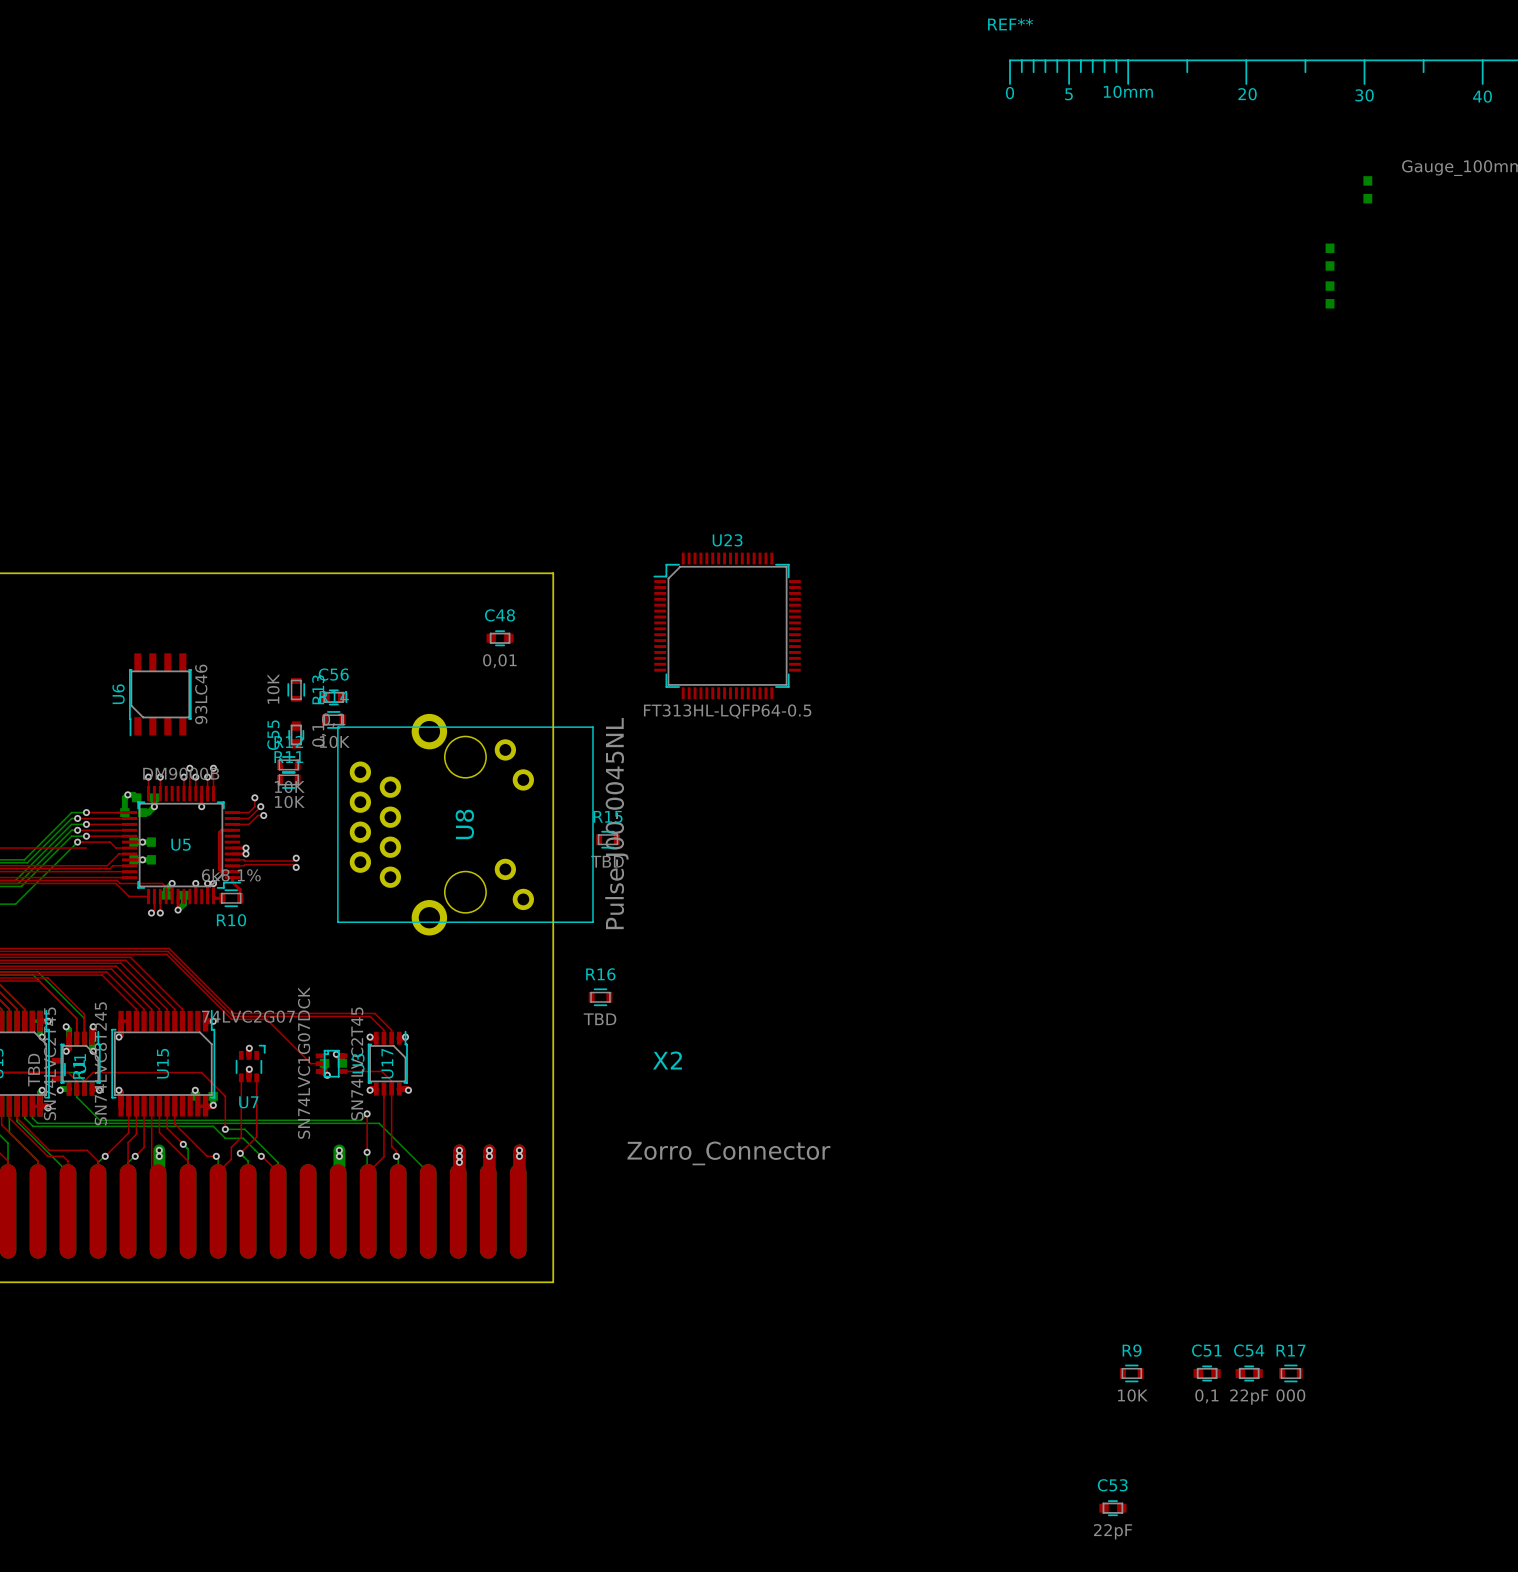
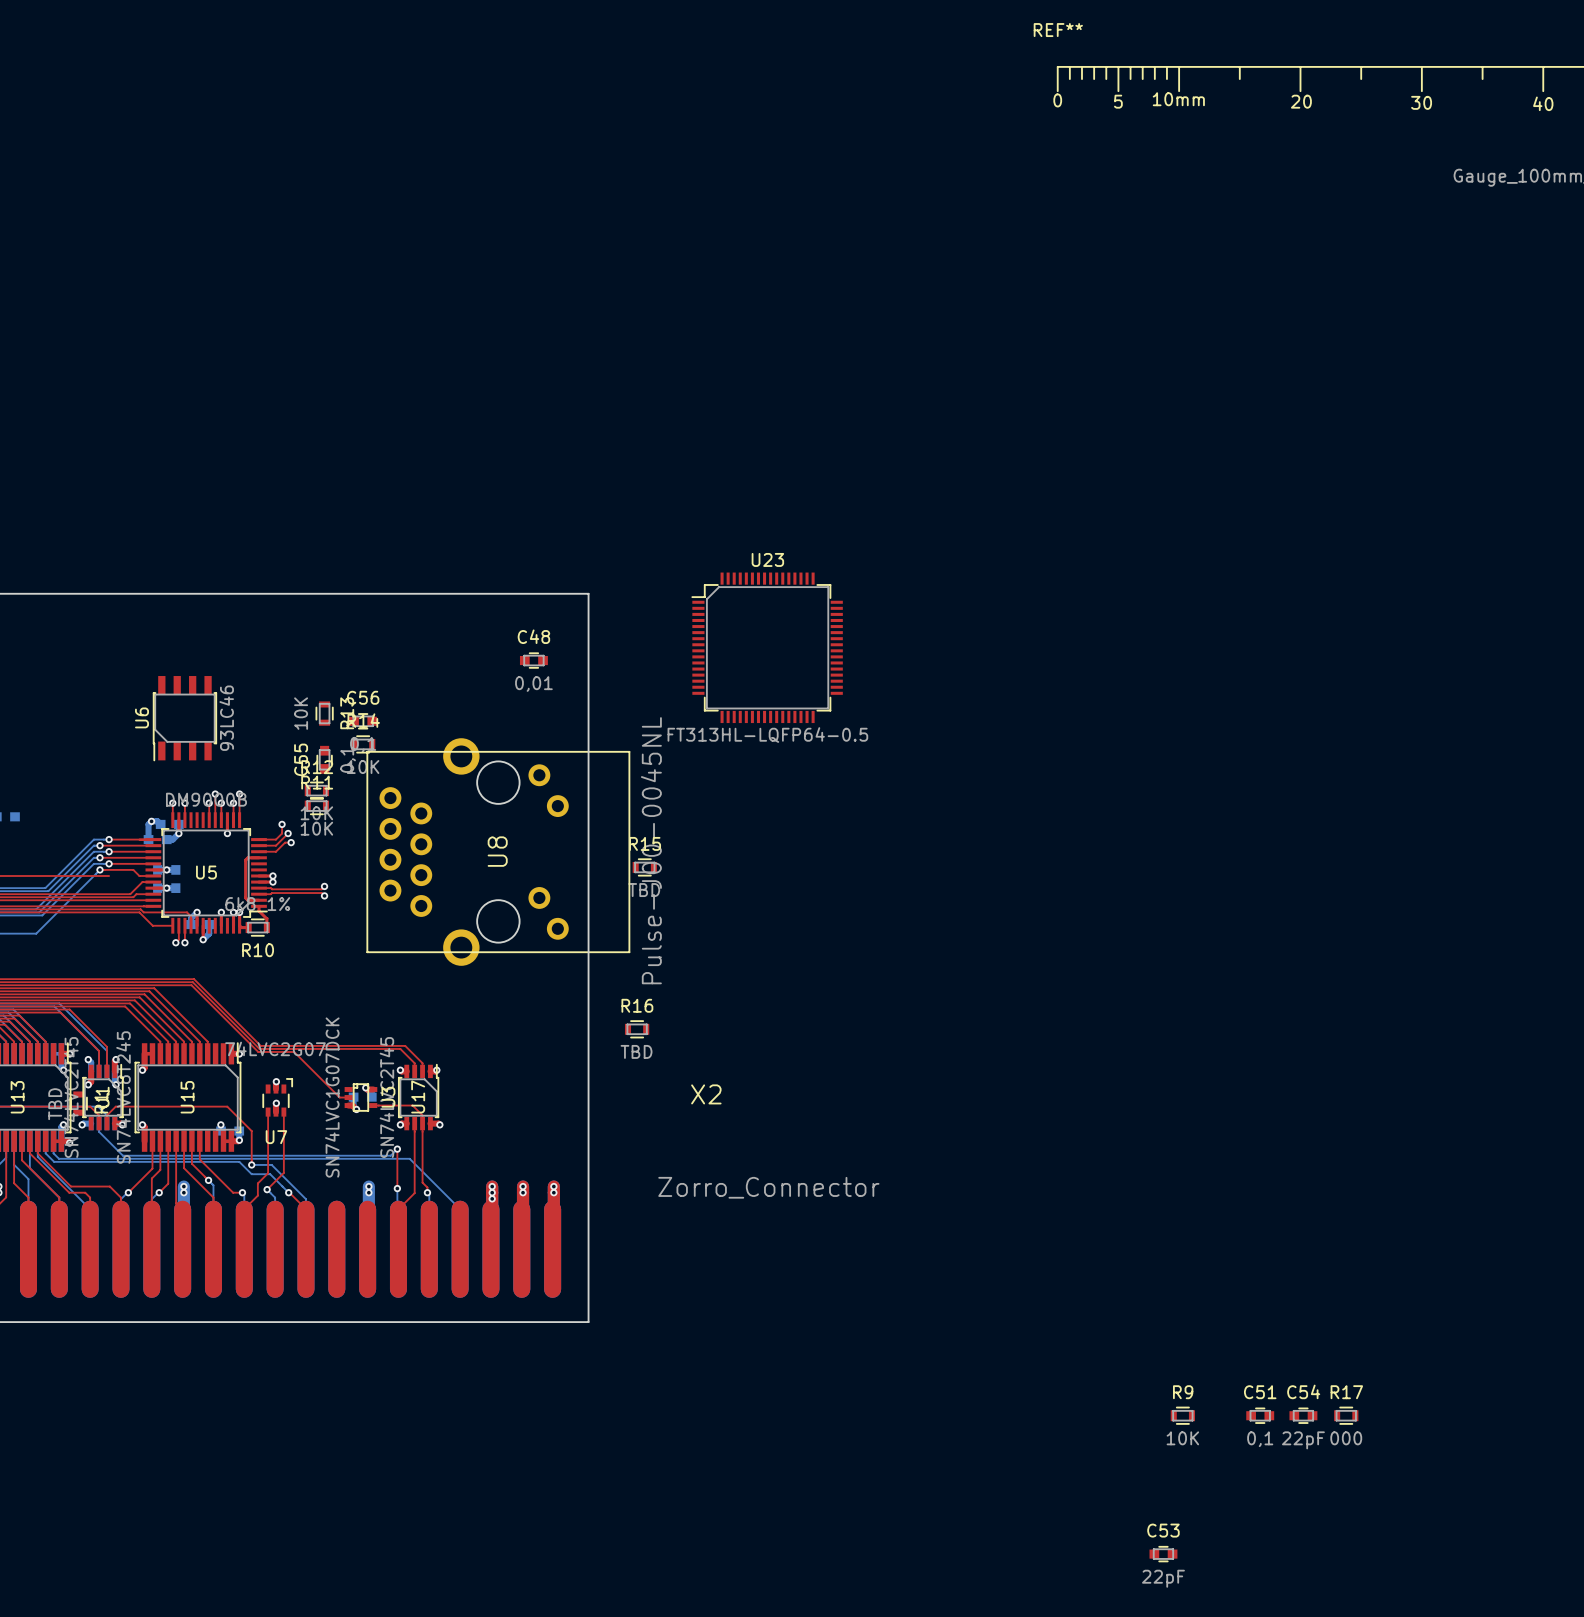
part: (1367, 189) -> none
part: (1330, 257) -> none
part: (1330, 294) -> none

